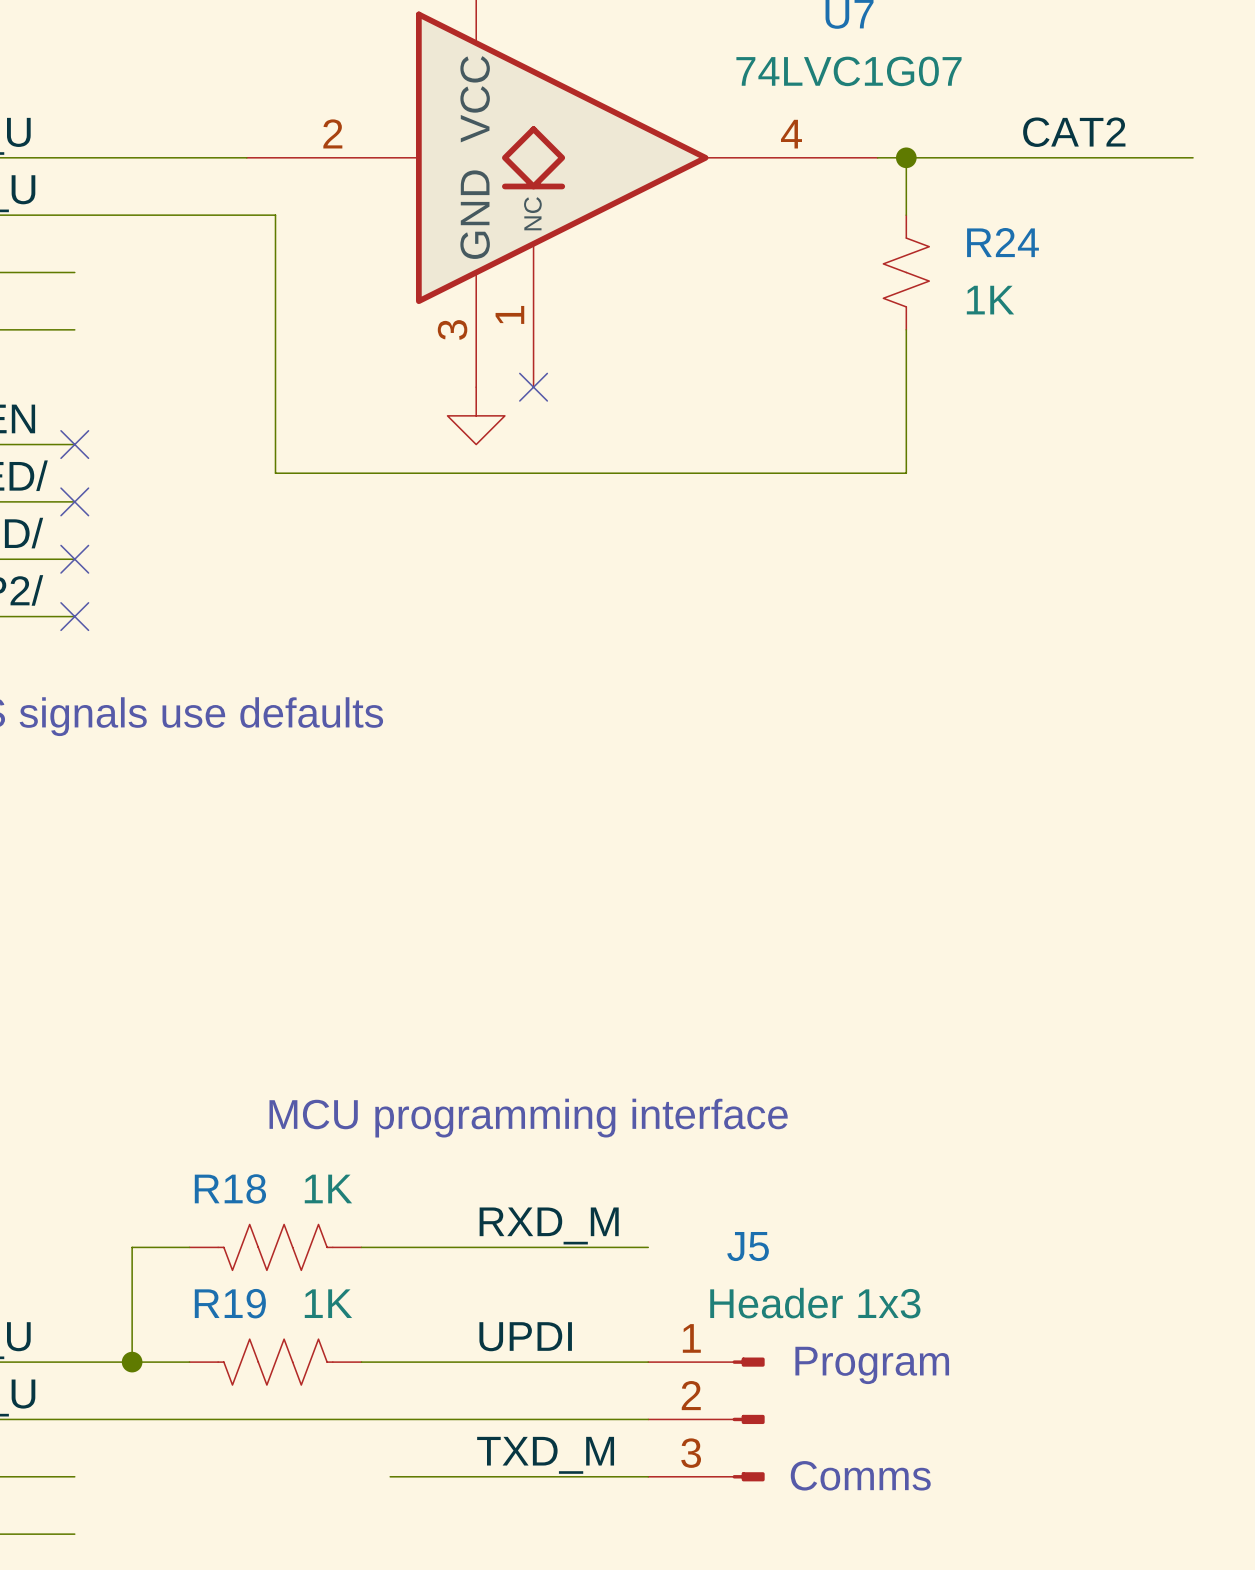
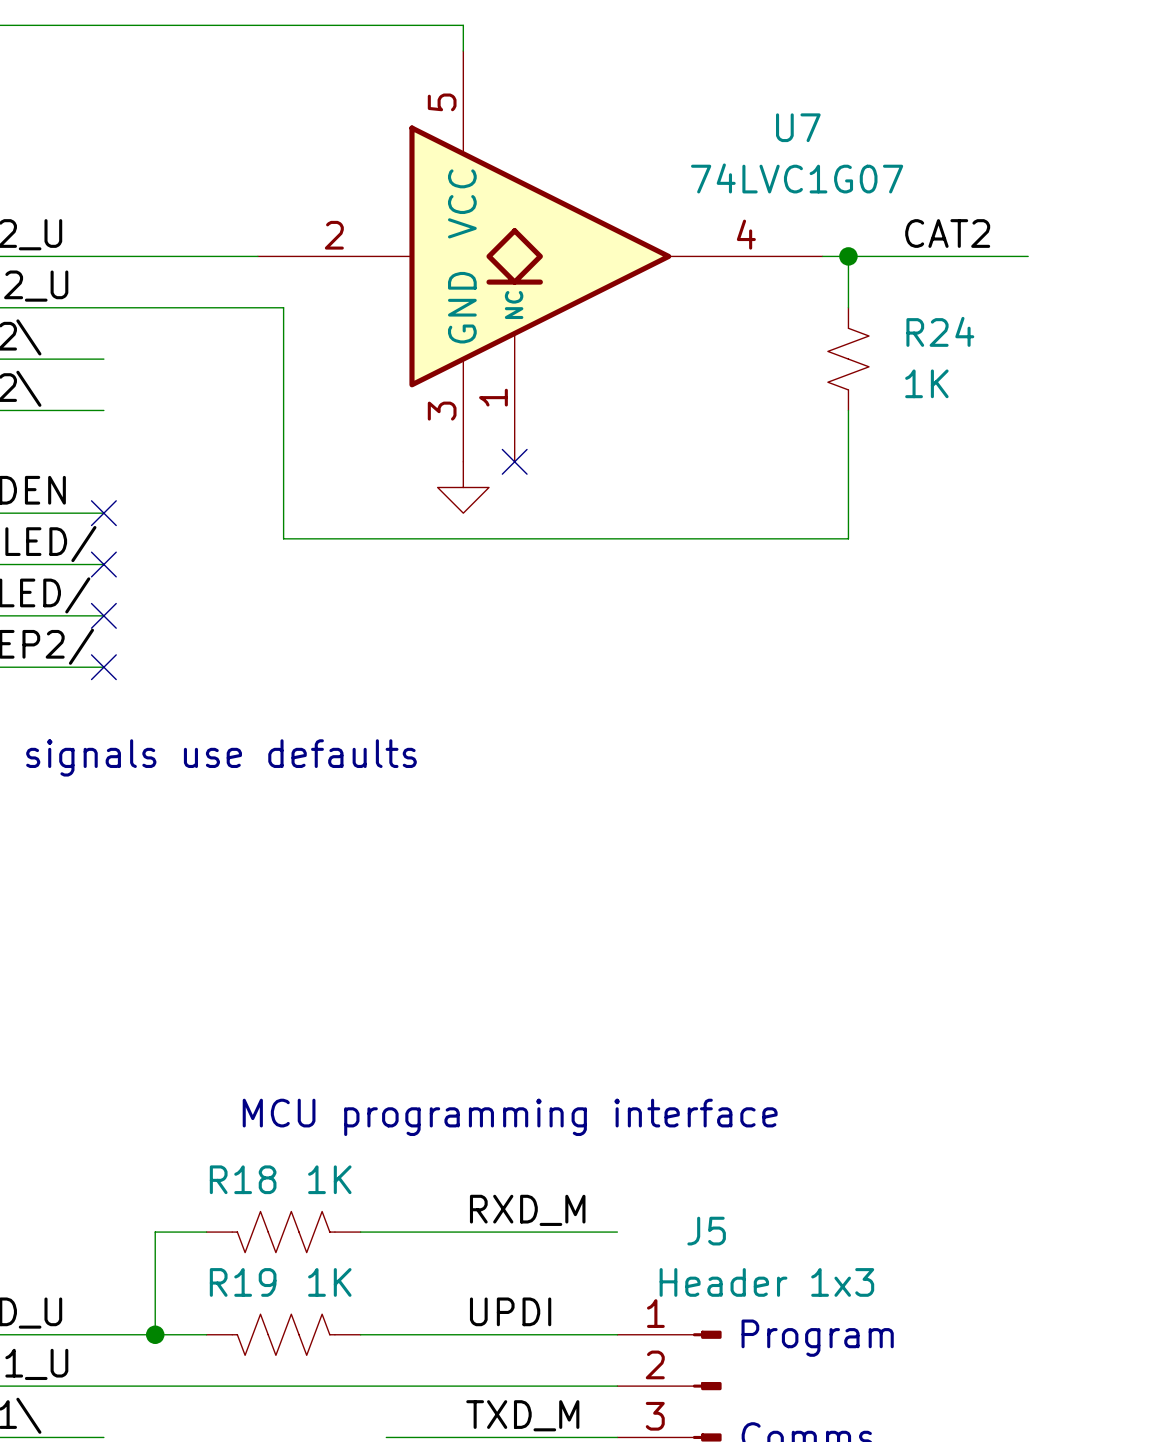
label position: CAT2 (1074, 132) -> CAT2 (947, 233)
wire: (1107, 157) (1193, 157) -> none

